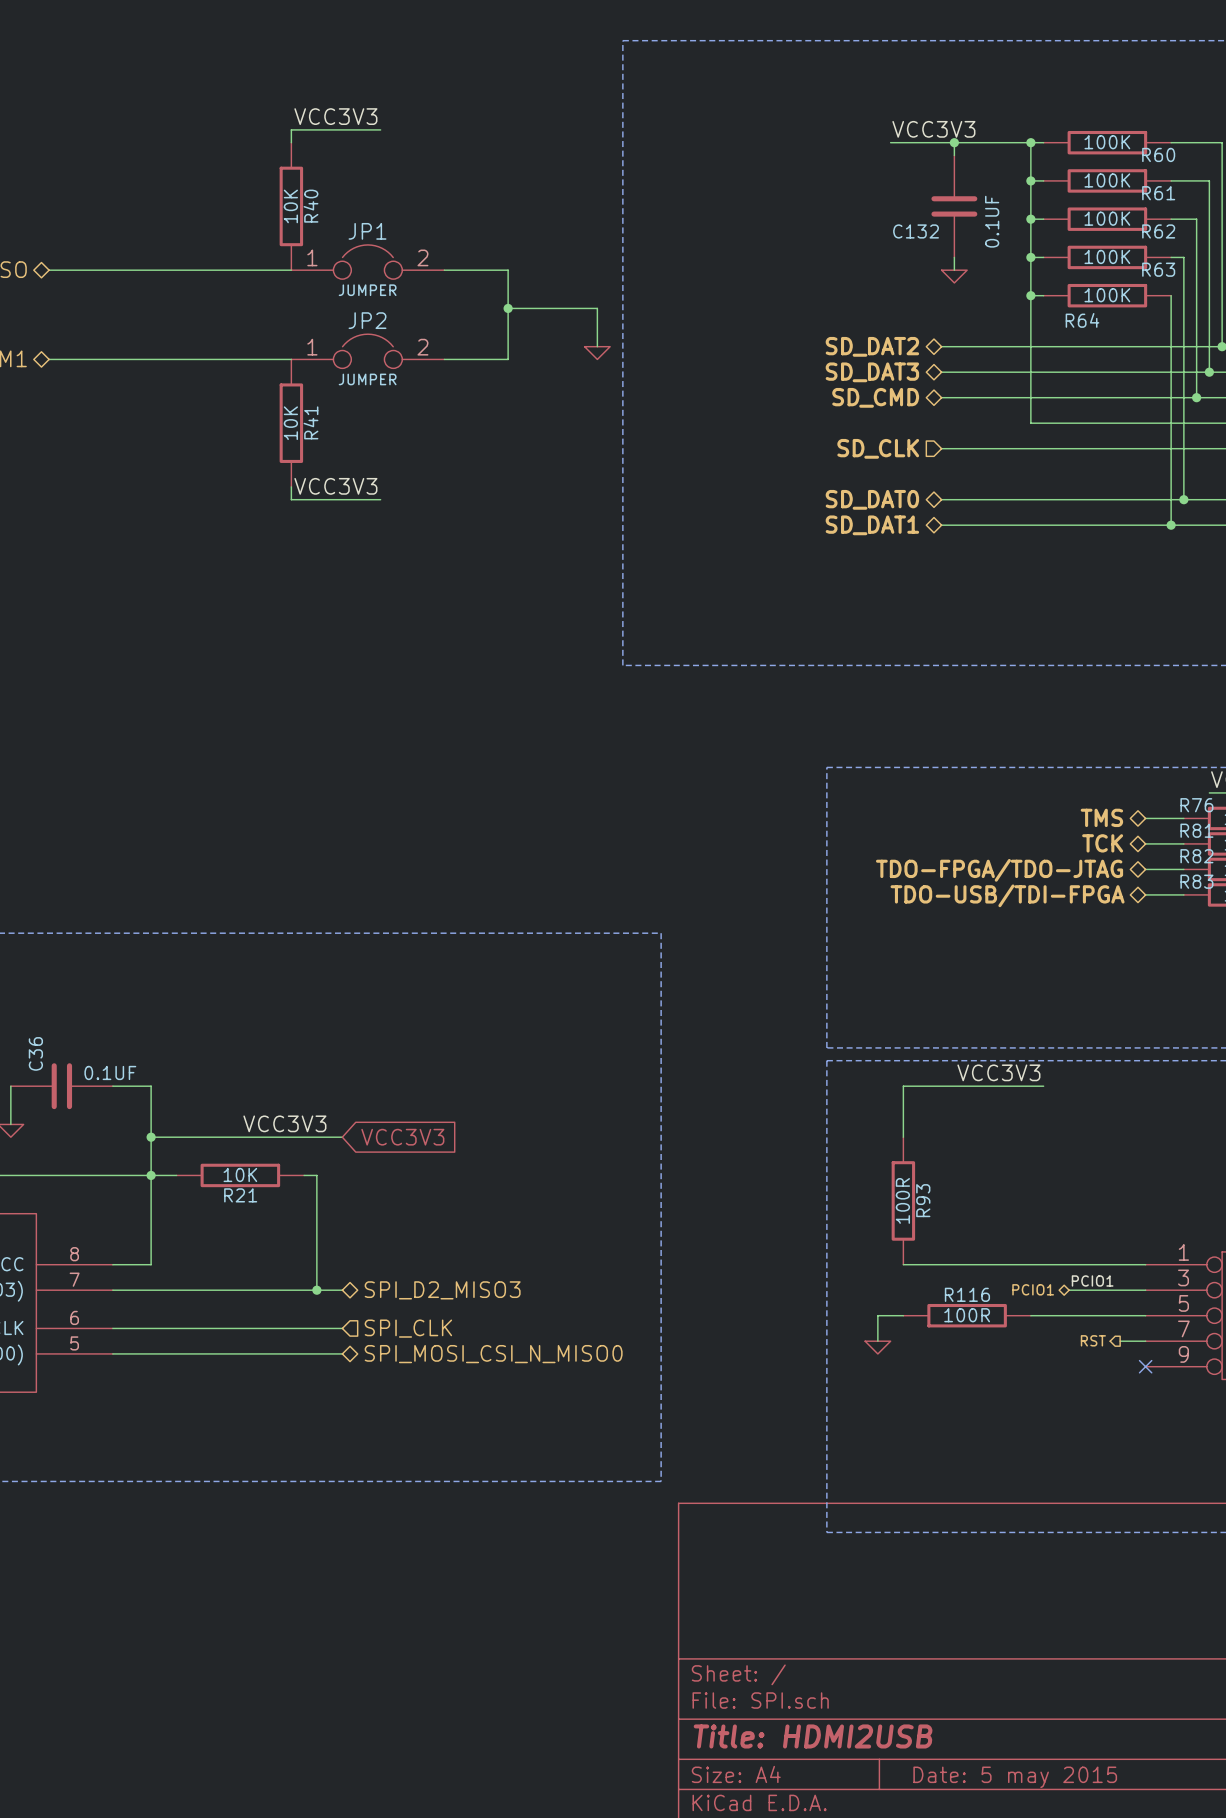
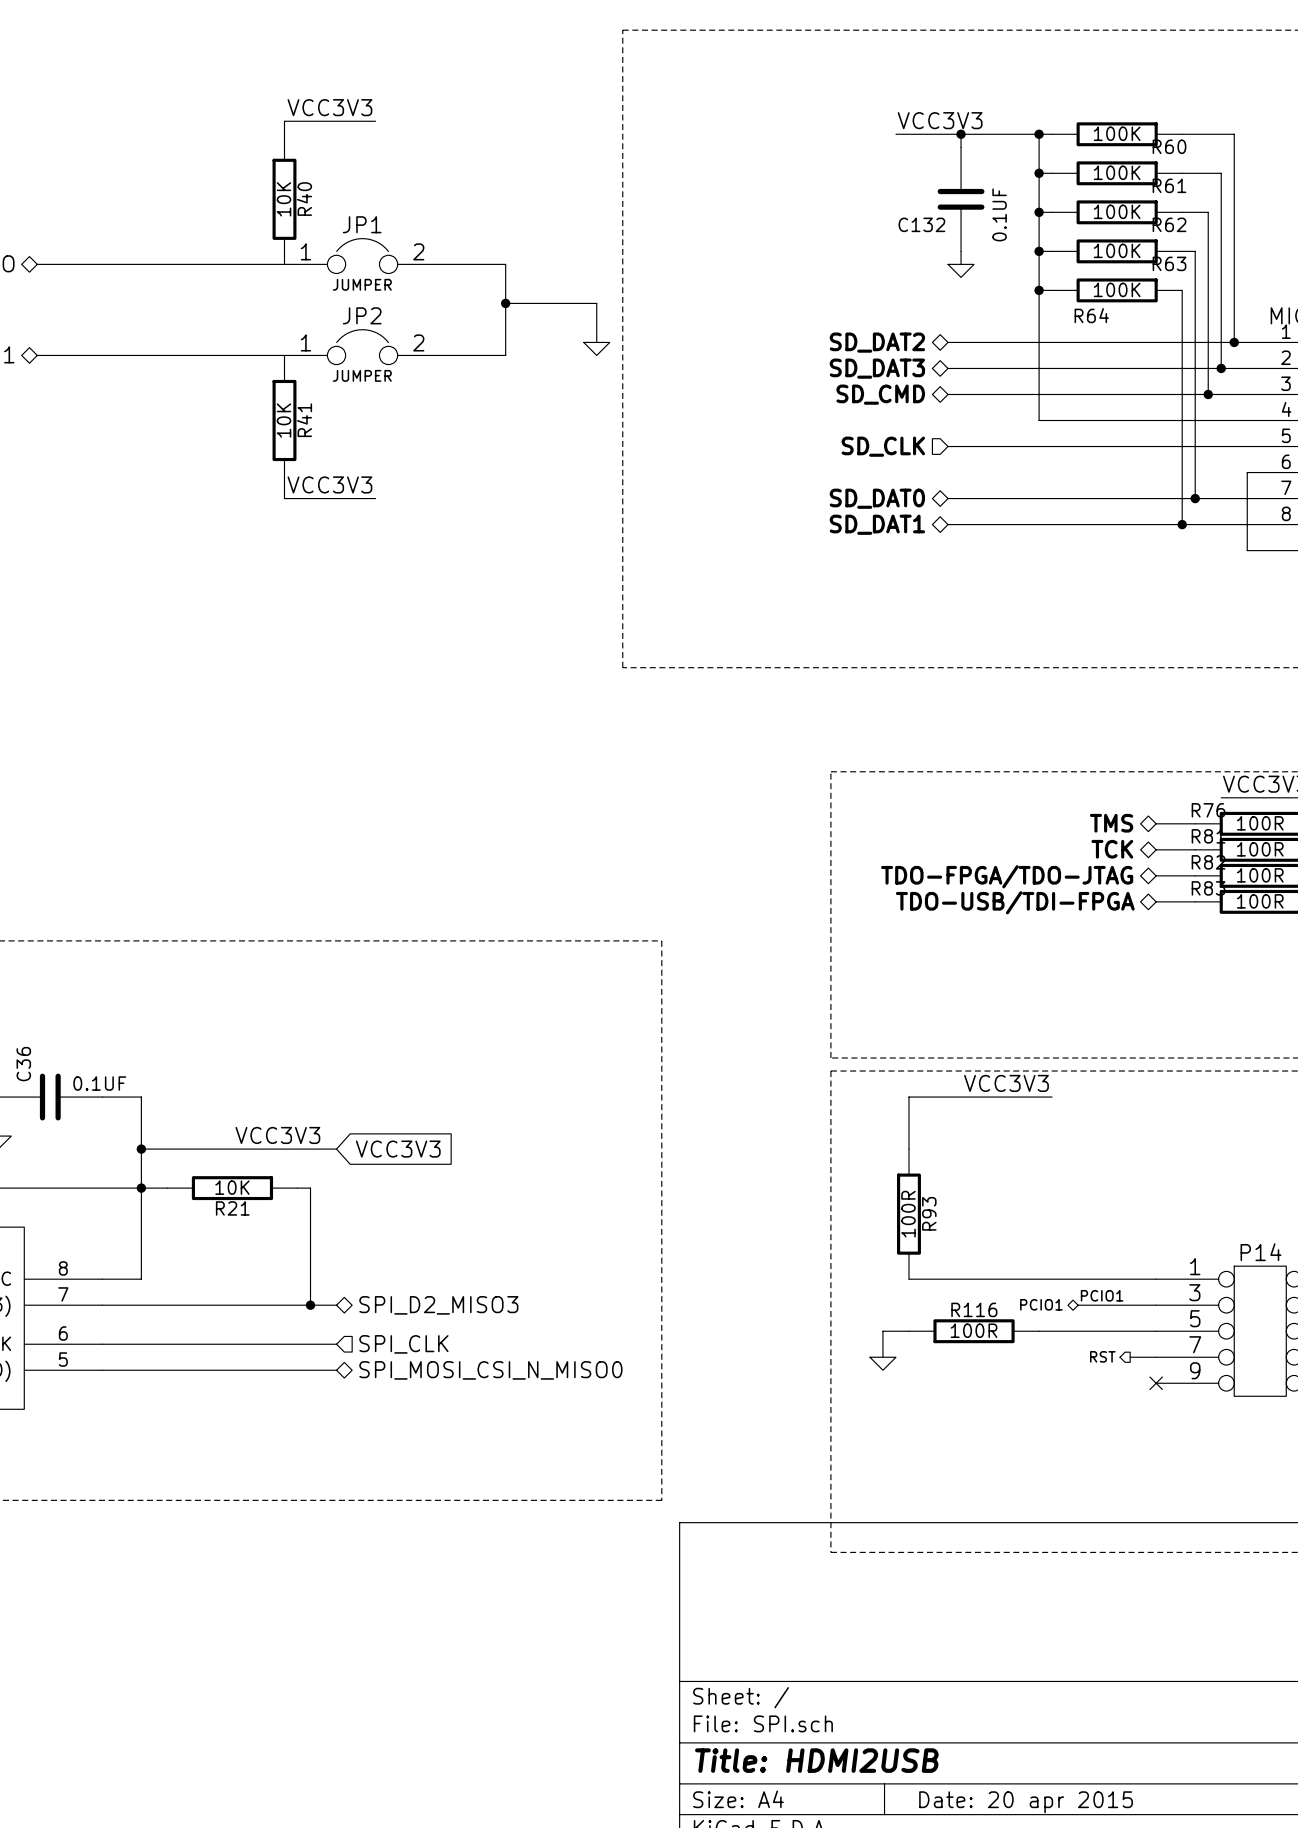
title block: Date: 5 may 2015 (1015, 1777) -> Date: 20 apr 2015 (1026, 1802)

